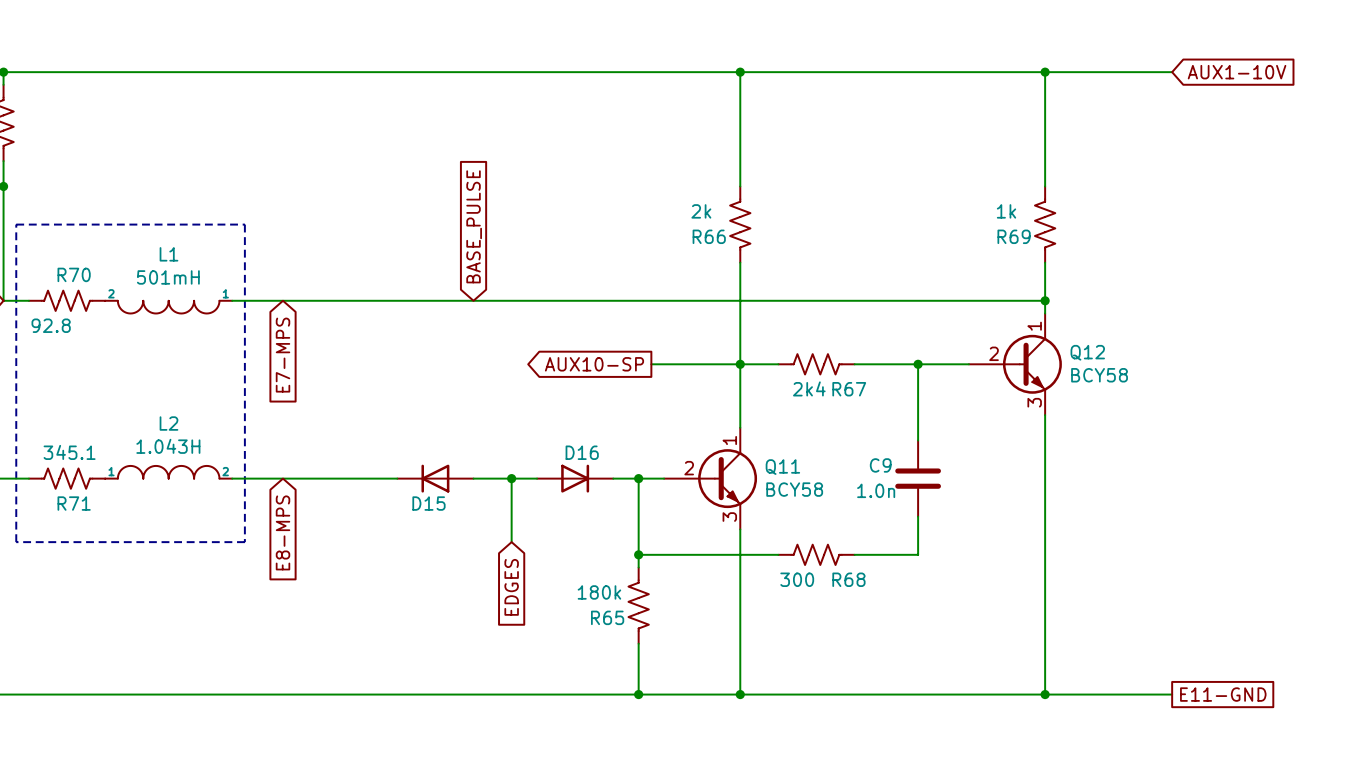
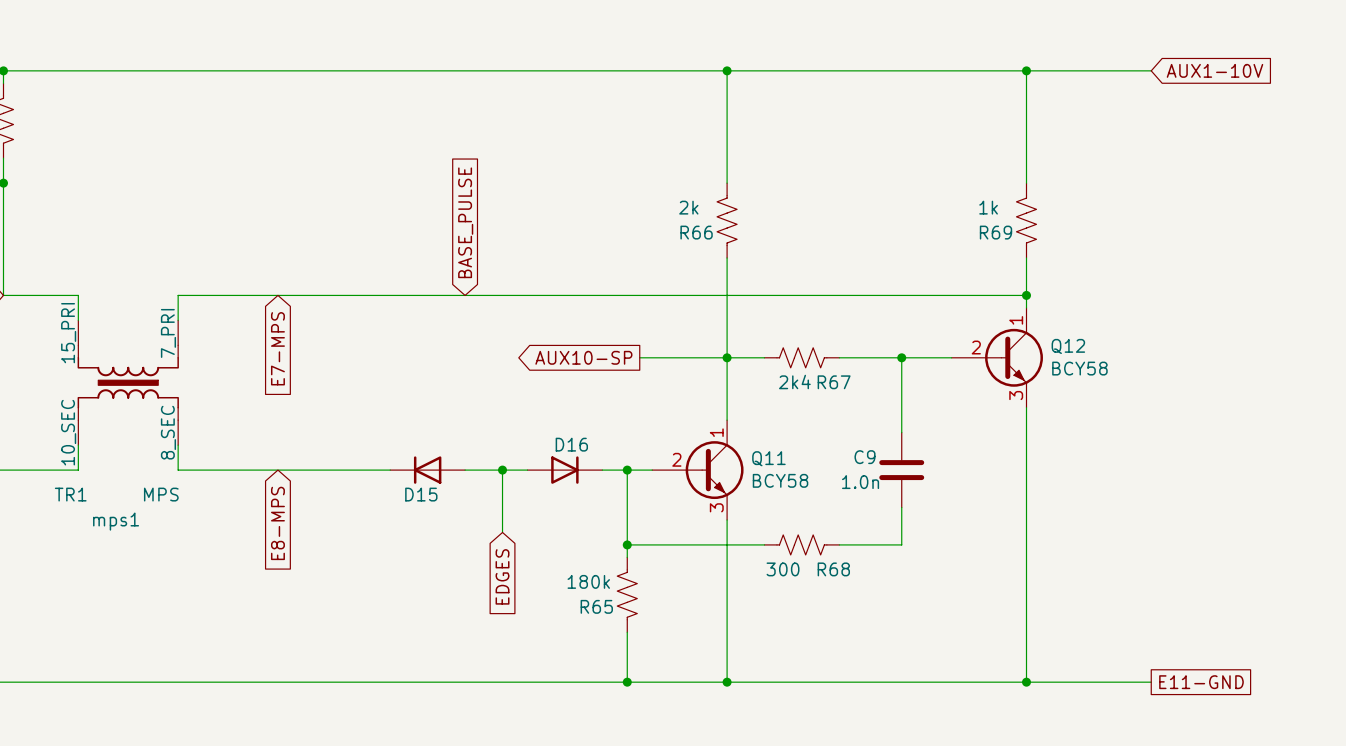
line: (16, 224) (16, 542) (244, 542) (244, 224) (16, 224) -> none
wire: none -> (28, 295) (78, 295) (78, 320)
R70: 92.8 (67, 300) -> none
wire: none -> (228, 295) (178, 295) (178, 320)
L1: 501mH (168, 307) -> none
TR1: none -> MPS (128, 382)
wire: none -> (78, 445) (78, 470) (28, 470)
wire: none -> (178, 445) (178, 470) (228, 470)
L2: 1.043H (168, 472) -> none
R71: 345.1 (67, 478) -> none

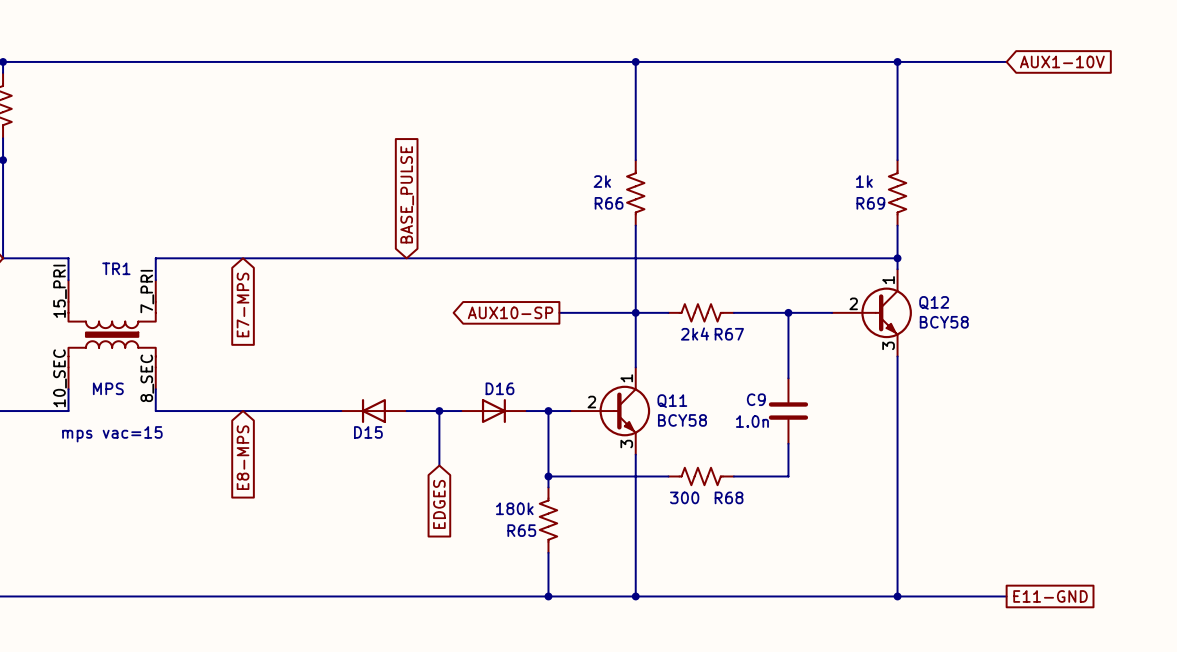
TR1 name position: TR1 (70, 494) -> TR1 (116, 268)
TR1 value position: MPS (161, 494) -> MPS (108, 388)
TR1 text: mps1 (116, 521) -> mps vac=15 (112, 434)

